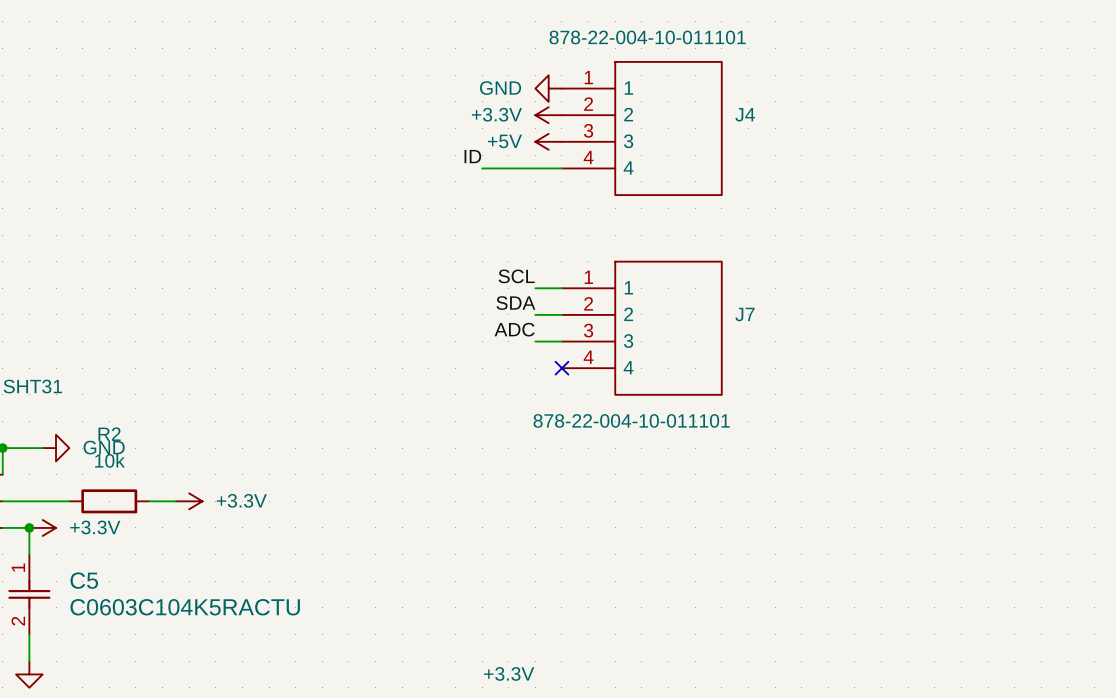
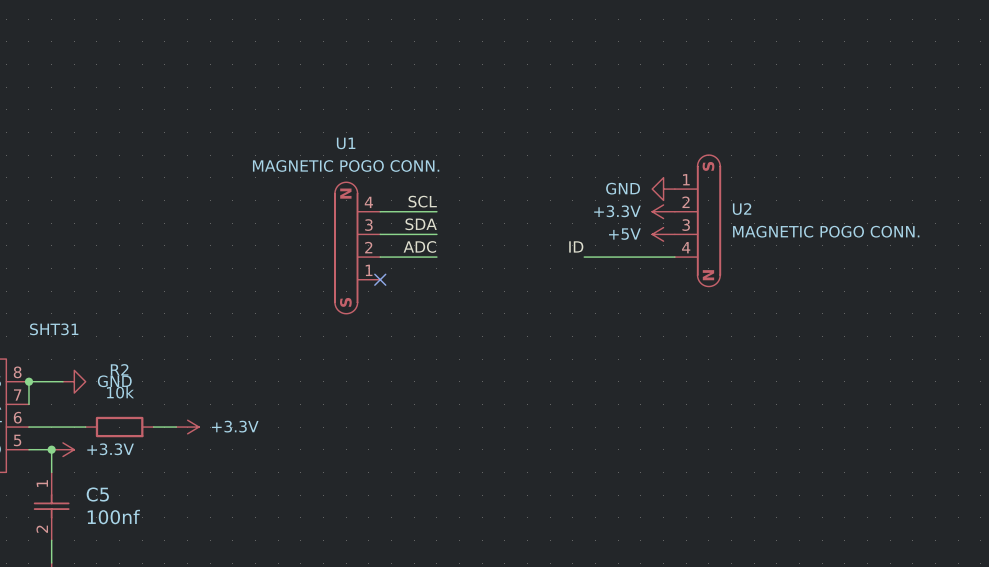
power symbol position: GND (548, 88) -> GND (663, 189)
power symbol position: +3.3V (548, 115) -> +3.3V (663, 211)
J4: 878-22-004-10-011101 (642, 128) -> none
power symbol position: +5V (548, 141) -> +5V (663, 234)
label position: ID (472, 156) -> ID (576, 246)
wire: (482, 168) (561, 168) -> none
wire: none -> (380, 211) (436, 211)
U2: none -> MAGNETIC POGO CONN. (697, 220)
wire: none -> (380, 234) (436, 234)
label position: SCL (516, 276) -> SCL (422, 201)
wire: (535, 288) (561, 288) -> none
U1: none -> MAGNETIC POGO CONN. (357, 247)
wire: none -> (380, 257) (436, 257)
wire: none -> (584, 257) (674, 257)
label position: SDA (515, 303) -> SDA (421, 224)
wire: (535, 314) (561, 314) -> none
no-connect mark: none -> (380, 279)
J7: 878-22-004-10-011101 (642, 328) -> none
label position: ADC (514, 329) -> ADC (419, 246)
wire: (535, 341) (561, 341) -> none
no-connect mark: (561, 368) -> none
C5 value: C0603C104K5RACTU (185, 607) -> 100nf (113, 517)

